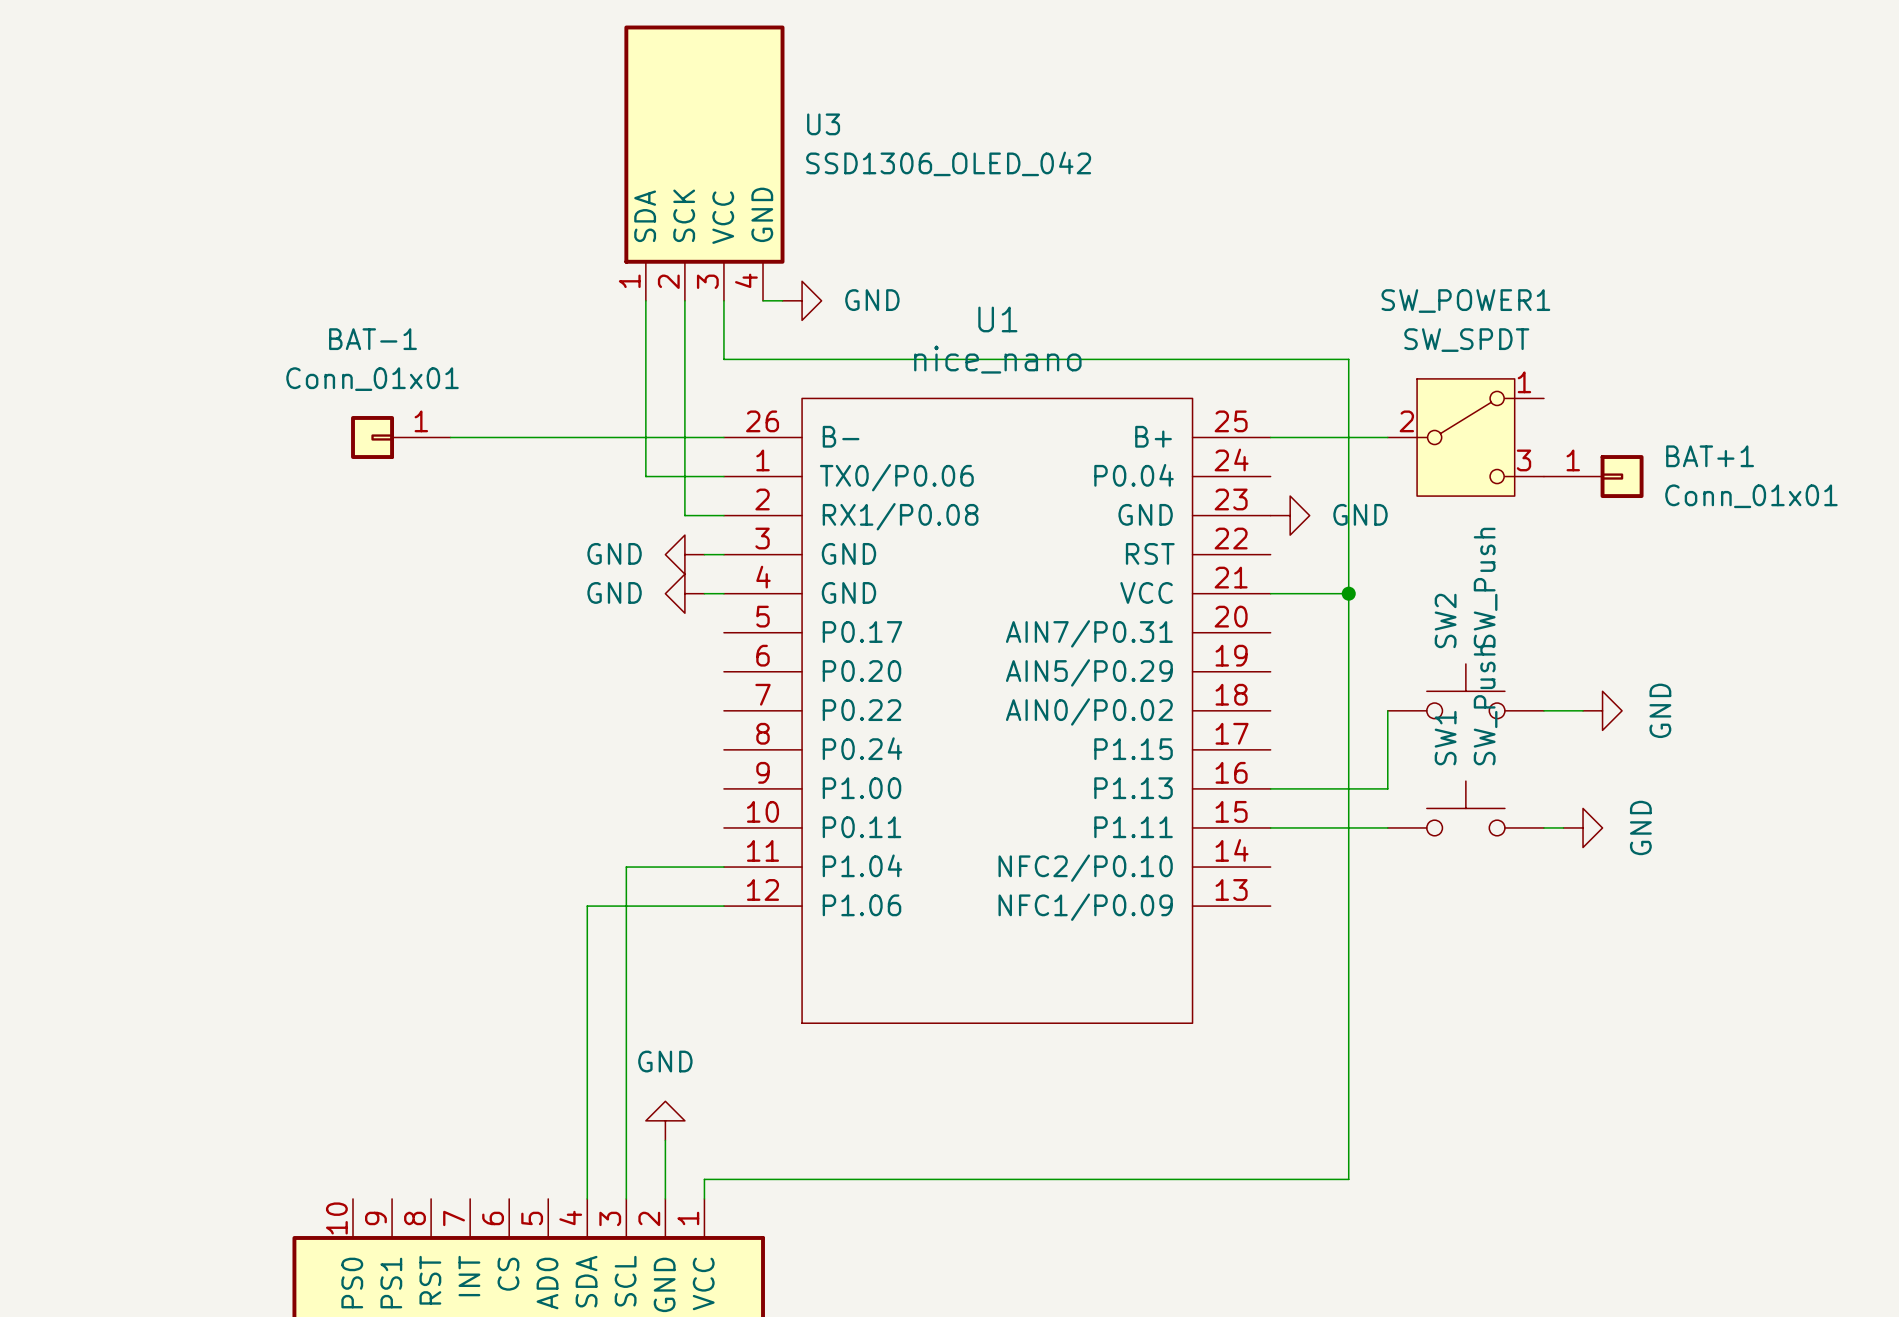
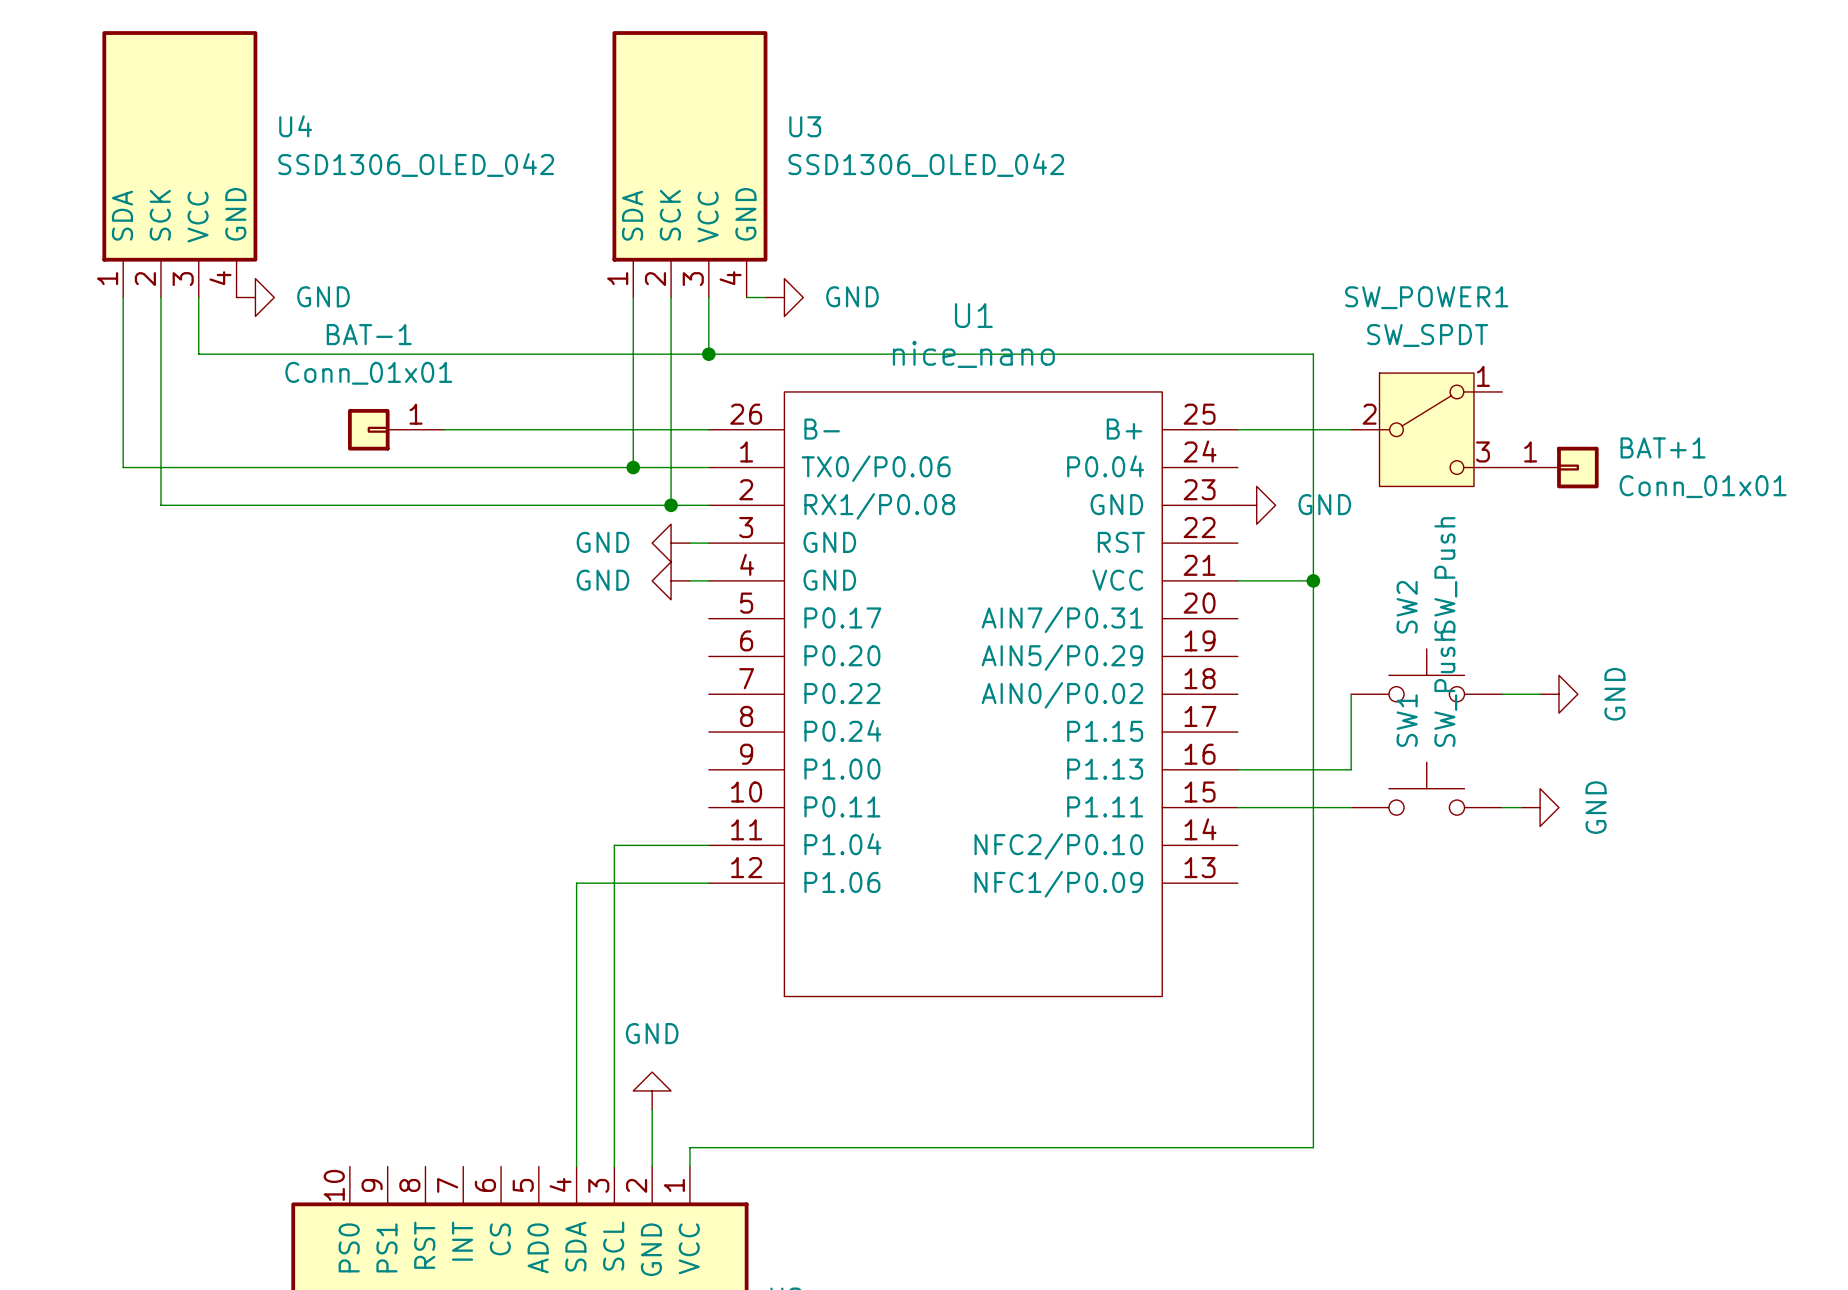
U4: none -> SSD1306_OLED_042 (179, 164)
wire: none -> (123, 297) (123, 467) (633, 467)
wire: none -> (160, 297) (160, 505) (671, 505)
wire: none -> (198, 297) (198, 354) (708, 354)
power symbol: none -> GND (255, 297)
junction: none -> (708, 354)
junction: none -> (633, 467)
junction: none -> (671, 505)

